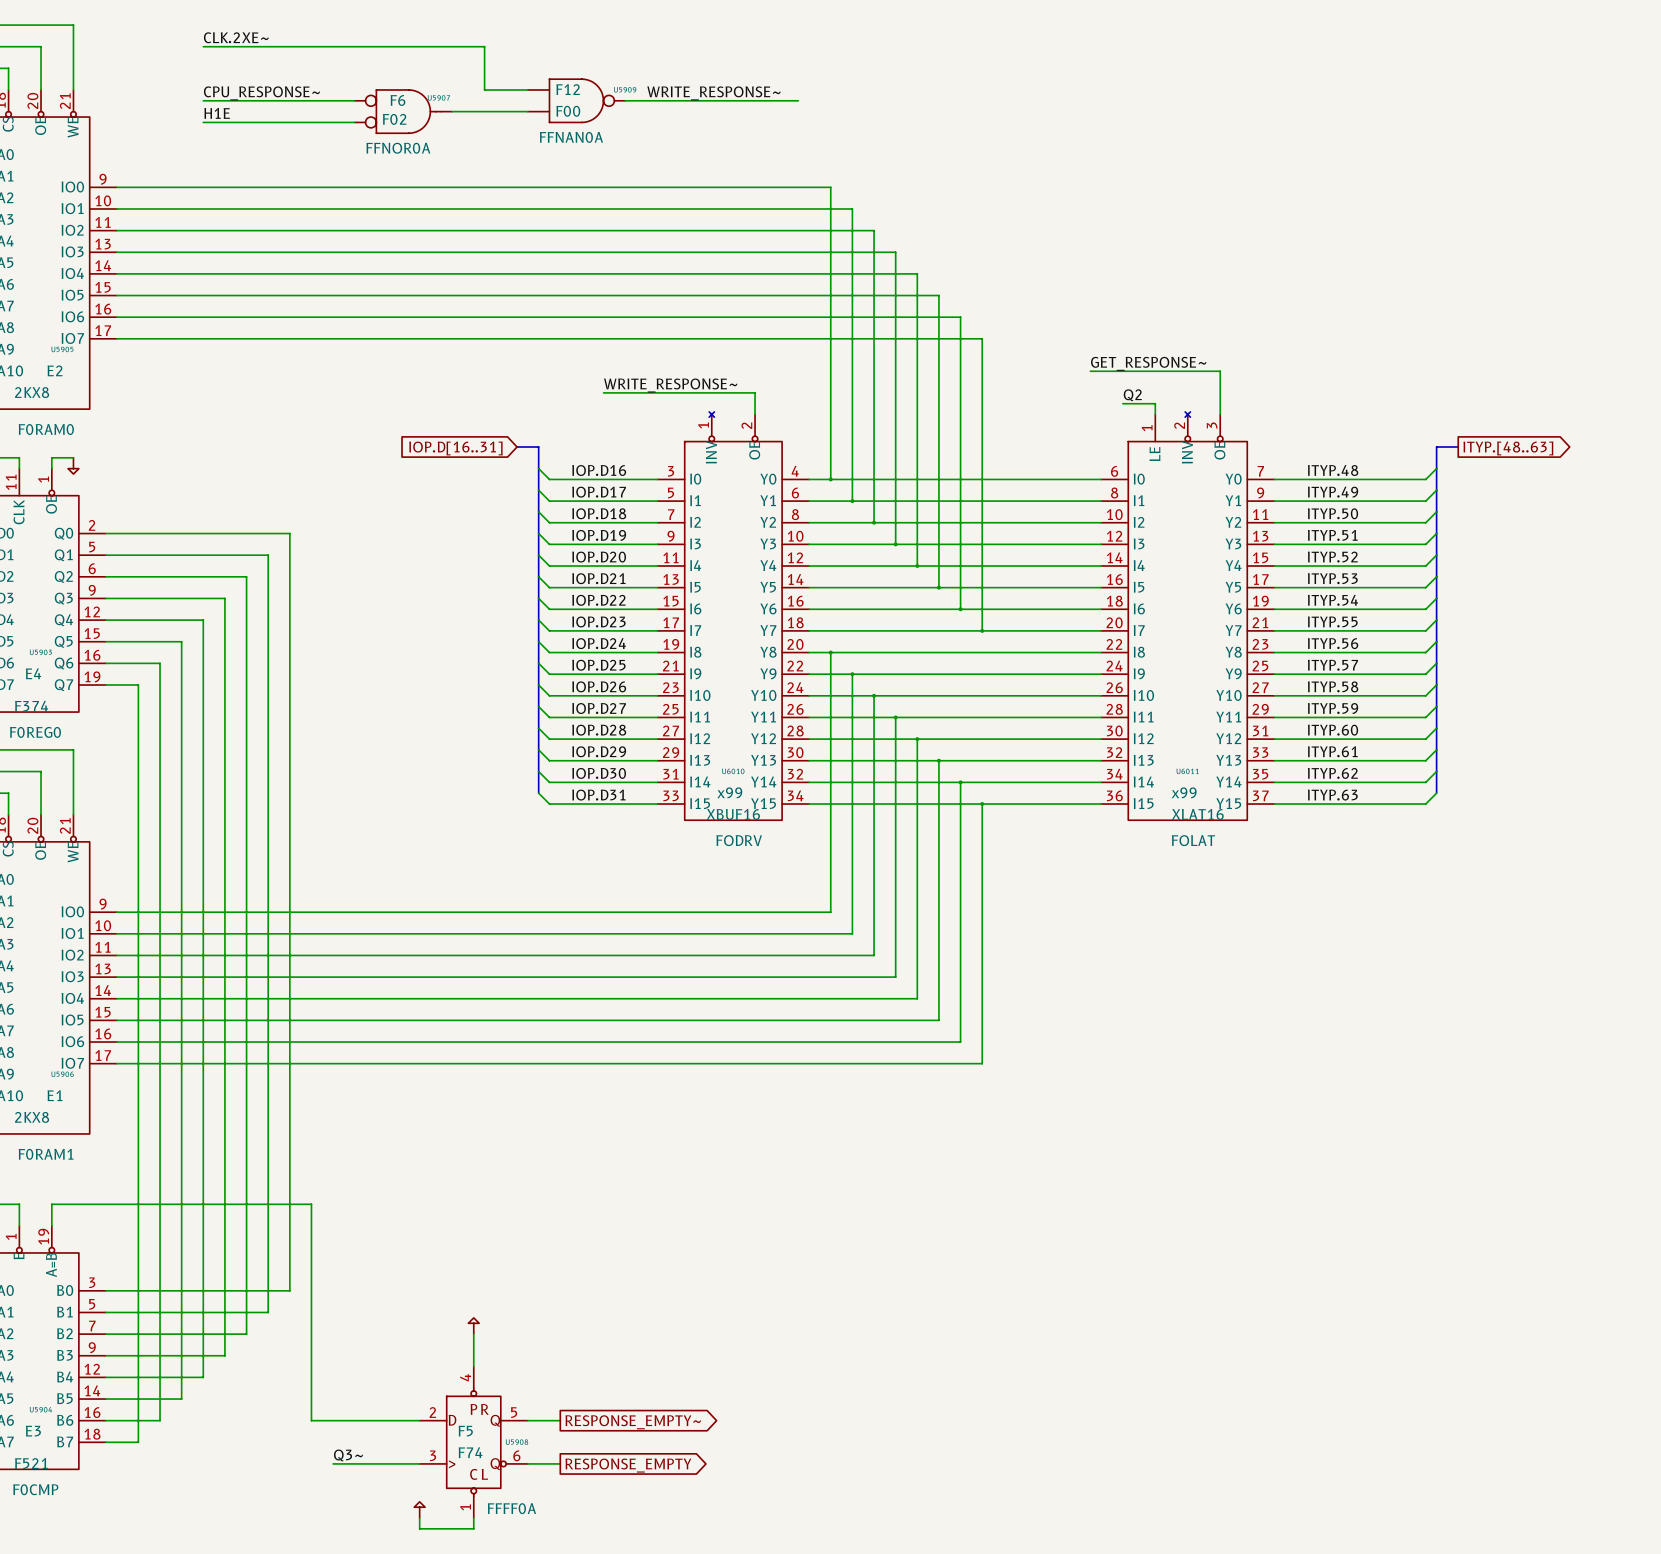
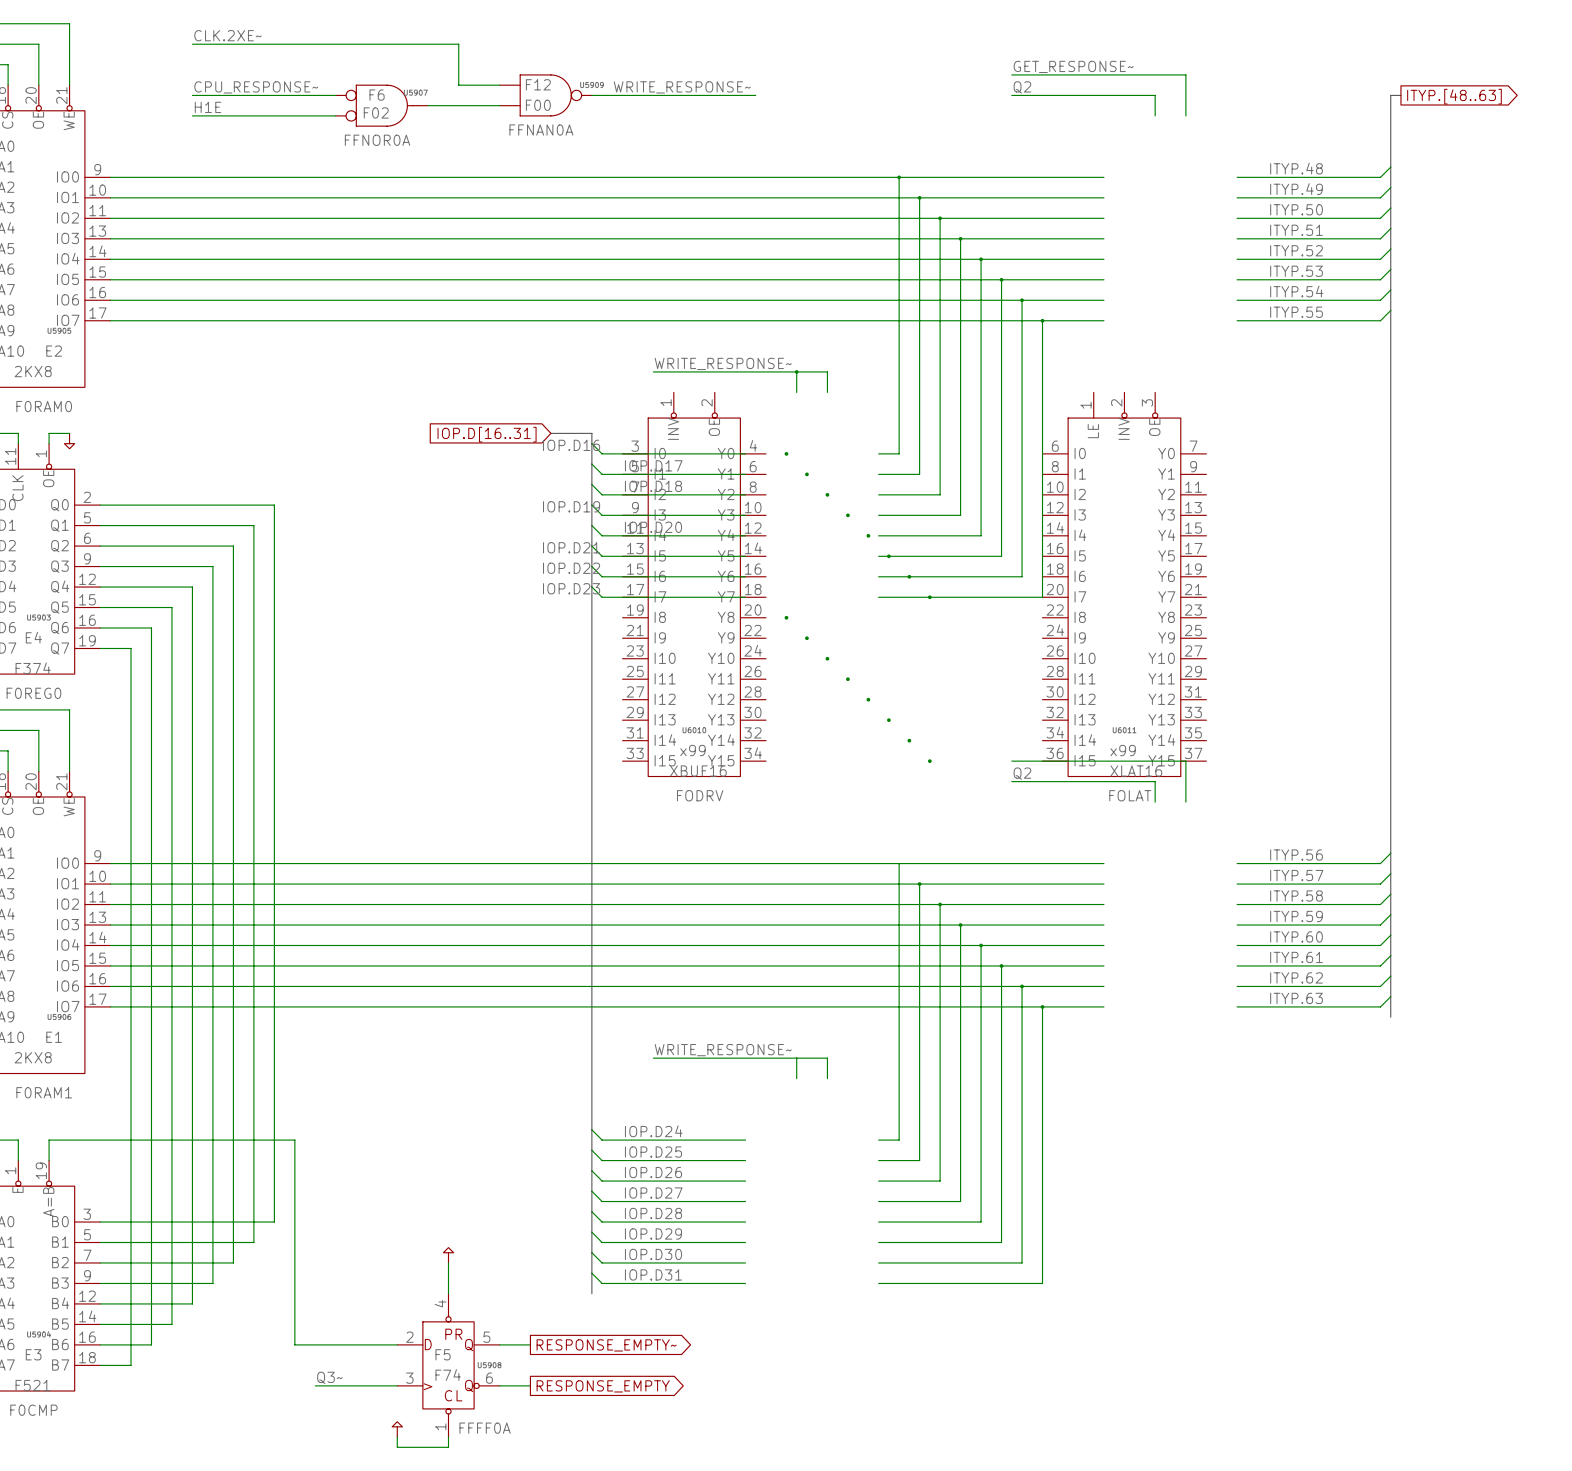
label: none -> GET_RESPONSE~ (1073, 66)
wire: none -> (1011, 74) (1185, 74) (1185, 115)
label: none -> Q2 (1022, 87)
wire: none -> (1011, 95) (1155, 95) (1155, 115)
bus: none -> (1400, 95) (1390, 95) (1390, 1017)
global label: none -> ITYP.[48..63] (1454, 96)
wire: none -> (1390, 167) (1380, 177) (1237, 177)
label: none -> ITYP.48 (1296, 168)
wire: (830, 187) (830, 479) -> (786, 177) (1103, 177)
junction: none -> (899, 177)
wire: none -> (1390, 187) (1380, 197) (1237, 197)
label: none -> ITYP.49 (1296, 189)
wire: (852, 208) (852, 501) -> (806, 197) (1103, 197)
junction: none -> (919, 197)
wire: none -> (1390, 208) (1380, 218) (1237, 218)
label: none -> ITYP.50 (1296, 209)
wire: (874, 230) (874, 392) -> (827, 218) (1103, 218)
junction: none -> (940, 218)
wire: none -> (1390, 228) (1380, 238) (1237, 238)
label: none -> ITYP.51 (1296, 230)
wire: (895, 252) (895, 544) -> (847, 238) (1103, 238)
junction: none -> (960, 238)
wire: none -> (1390, 249) (1380, 259) (1237, 259)
label: none -> ITYP.52 (1296, 250)
wire: (917, 273) (917, 566) -> (868, 259) (1103, 259)
junction: none -> (981, 259)
wire: none -> (1390, 269) (1380, 279) (1237, 279)
label: none -> ITYP.53 (1296, 271)
wire: (938, 295) (938, 587) -> (888, 279) (1103, 279)
junction: none -> (1001, 279)
wire: none -> (1390, 290) (1380, 300) (1237, 300)
label: none -> ITYP.54 (1296, 291)
wire: (960, 317) (960, 609) -> (909, 300) (1103, 300)
junction: none -> (1022, 300)
wire: none -> (1390, 310) (1380, 320) (1237, 320)
label: none -> ITYP.55 (1296, 312)
wire: (982, 338) (982, 630) -> (929, 320) (1103, 320)
wire: none -> (1042, 320) (1042, 597)
junction: none -> (1042, 320)
label: GET_RESPONSE~ (1148, 363) -> none
wire: (1090, 371) (1220, 371) (1220, 414) -> none
label position: WRITE_RESPONSE~ (670, 385) -> WRITE_RESPONSE~ (723, 363)
wire: (603, 392) (690, 392) -> none
wire: (755, 392) (755, 414) -> (714, 371) (827, 371)
wire: none -> (796, 371) (796, 392)
junction: none -> (796, 371)
label: Q2 (1132, 395) -> none
wire: (1122, 403) (1155, 403) (1155, 414) -> none
no-connect mark: (711, 414) -> none
wire: (874, 414) (874, 522) -> none
no-connect mark: (1187, 414) -> none
bus: (517, 447) (538, 447) (538, 793) -> none
bus: (1458, 447) (1436, 447) (1436, 793) -> none
global label position: IOP.D[16..31] (455, 448) -> IOP.D[16..31] (487, 434)
global label: ITYP.[48..63] (1508, 448) -> none
bus: none -> (550, 433) (591, 433) (591, 1293)
wire: (538, 468) (549, 479) (636, 479) -> (591, 443) (602, 453)
wire: (1436, 468) (1425, 479) (1274, 479) -> none
label: ITYP.48 (1333, 470) -> none
wire: none -> (622, 453) (745, 453)
wire: (809, 479) (928, 479) -> none
wire: (949, 479) (1101, 479) -> (899, 453) (899, 177)
wire: (538, 490) (549, 501) (636, 501) -> (591, 464) (602, 474)
wire: (1436, 490) (1425, 501) (1274, 501) -> none
label position: IOP.D17 (599, 492) -> IOP.D17 (653, 465)
label: ITYP.49 (1333, 492) -> none
wire: none -> (622, 474) (745, 474)
wire: (809, 501) (928, 501) -> none
wire: (971, 501) (1101, 501) -> (919, 474) (919, 197)
wire: (538, 511) (549, 522) (636, 522) -> (591, 484) (602, 494)
wire: (1436, 511) (1425, 522) (1274, 522) -> none
label position: IOP.D18 (599, 513) -> IOP.D18 (653, 486)
label: ITYP.50 (1333, 513) -> none
wire: none -> (622, 494) (745, 494)
wire: (809, 522) (928, 522) -> none
wire: (993, 522) (1101, 522) -> (940, 494) (940, 218)
wire: (538, 533) (549, 544) (636, 544) -> (591, 505) (602, 515)
wire: (1436, 533) (1425, 544) (1274, 544) -> none
label: ITYP.51 (1332, 535) -> none
wire: none -> (622, 515) (745, 515)
wire: (809, 544) (928, 544) -> none
wire: (1014, 544) (1101, 544) -> (960, 515) (960, 238)
wire: (538, 555) (549, 566) (636, 566) -> (591, 525) (602, 535)
wire: (1436, 555) (1425, 566) (1274, 566) -> none
label position: IOP.D20 (599, 557) -> IOP.D20 (653, 527)
label: ITYP.52 (1332, 557) -> none
wire: none -> (622, 535) (745, 535)
wire: (809, 566) (928, 566) -> none
wire: (1036, 566) (1101, 566) -> (981, 535) (981, 259)
wire: (538, 576) (549, 587) (636, 587) -> (591, 546) (602, 556)
wire: (1436, 576) (1425, 587) (1274, 587) -> none
label: ITYP.53 (1332, 578) -> none
wire: none -> (622, 556) (745, 556)
wire: (809, 587) (928, 587) -> none
wire: (1057, 587) (1101, 587) -> (1001, 556) (1001, 279)
wire: (538, 598) (549, 609) (636, 609) -> (591, 566) (602, 576)
wire: (1436, 598) (1425, 609) (1274, 609) -> none
label: ITYP.54 (1332, 600) -> none
wire: none -> (622, 576) (745, 576)
wire: (809, 609) (928, 609) -> none
wire: (1079, 609) (1101, 609) -> (1022, 576) (1022, 300)
wire: (538, 620) (549, 630) (636, 630) -> (591, 587) (602, 597)
wire: (1436, 620) (1425, 630) (1274, 630) -> none
label: ITYP.55 (1332, 621) -> none
wire: none -> (622, 597) (745, 597)
wire: (809, 630) (928, 630) -> none
wire: (538, 641) (549, 652) (657, 652) -> none
wire: (1436, 641) (1425, 652) (1274, 652) -> none
label: IOP.D24 (599, 643) -> none
label: ITYP.56 (1333, 643) -> none
wire: (809, 652) (1101, 652) -> none
wire: (830, 652) (830, 912) -> (1103, 863) (786, 863)
wire: (538, 663) (549, 674) (657, 674) -> none
wire: (1436, 663) (1425, 674) (1274, 674) -> none
label: IOP.D25 (598, 665) -> none
label: ITYP.57 (1332, 665) -> none
wire: (809, 674) (1101, 674) -> none
wire: (852, 674) (852, 933) -> (1103, 884) (806, 884)
wire: (538, 685) (549, 695) (657, 695) -> none
wire: (1436, 685) (1425, 695) (1274, 695) -> none
label: IOP.D26 (599, 686) -> none
label: ITYP.58 (1333, 686) -> none
wire: (809, 695) (1101, 695) -> none
wire: (874, 695) (874, 955) -> (1103, 904) (827, 904)
wire: (538, 706) (549, 717) (657, 717) -> none
wire: (1436, 706) (1425, 717) (1274, 717) -> none
label: IOP.D27 (599, 708) -> none
label: ITYP.59 (1333, 708) -> none
wire: (809, 717) (1101, 717) -> none
wire: (895, 717) (895, 977) -> (1103, 925) (847, 925)
wire: (538, 728) (549, 739) (657, 739) -> none
wire: (1436, 728) (1425, 739) (1274, 739) -> none
label: IOP.D28 (599, 730) -> none
label: ITYP.60 (1333, 730) -> none
wire: (809, 739) (1101, 739) -> none
wire: (917, 739) (917, 998) -> (1103, 945) (868, 945)
wire: (538, 749) (549, 760) (657, 760) -> none
wire: (1436, 749) (1425, 760) (1274, 760) -> none
label: IOP.D29 (599, 751) -> none
label: ITYP.61 (1332, 751) -> none
wire: (809, 760) (1101, 760) -> none
wire: (938, 760) (938, 1020) -> (1103, 965) (888, 965)
wire: (538, 771) (549, 782) (657, 782) -> none
wire: (1436, 771) (1425, 782) (1274, 782) -> none
label: IOP.D30 (599, 773) -> none
label: ITYP.62 (1332, 773) -> none
wire: (809, 782) (1101, 782) -> none
wire: (960, 782) (960, 1042) -> (1103, 986) (909, 986)
wire: (538, 793) (549, 804) (657, 804) -> none
wire: (1436, 793) (1425, 804) (1274, 804) -> none
label: IOP.D31 (598, 795) -> none
label: ITYP.63 (1332, 795) -> none
wire: (809, 804) (1068, 804) -> none
wire: (982, 804) (982, 1063) -> (1103, 1006) (929, 1006)
wire: none -> (1042, 761) (1185, 761) (1185, 802)
label: none -> Q2 (1022, 773)
wire: none -> (1011, 781) (1155, 781) (1155, 802)
wire: none -> (1390, 853) (1380, 863) (1237, 863)
label: none -> ITYP.56 (1296, 855)
wire: none -> (899, 863) (899, 1140) (878, 1140)
wire: none -> (1390, 873) (1380, 884) (1237, 884)
label: none -> ITYP.57 (1296, 875)
wire: none -> (919, 884) (919, 1160) (878, 1160)
junction: none -> (919, 884)
wire: none -> (1390, 894) (1380, 904) (1237, 904)
label: none -> ITYP.58 (1296, 896)
wire: none -> (940, 904) (940, 1181) (878, 1181)
junction: none -> (940, 904)
wire: none -> (1390, 914) (1380, 925) (1237, 925)
label: none -> ITYP.59 (1296, 916)
wire: none -> (960, 925) (960, 1201) (878, 1201)
junction: none -> (960, 925)
wire: none -> (1390, 935) (1380, 945) (1237, 945)
label: none -> ITYP.60 (1296, 936)
wire: none -> (981, 945) (981, 1222) (878, 1222)
junction: none -> (981, 945)
wire: none -> (1390, 955) (1380, 965) (1237, 965)
label: none -> ITYP.61 (1296, 957)
wire: none -> (1001, 965) (1001, 1242) (878, 1242)
junction: none -> (1001, 965)
wire: none -> (1390, 976) (1380, 986) (1237, 986)
label: none -> ITYP.62 (1296, 977)
wire: none -> (1022, 986) (1022, 1262) (878, 1262)
junction: none -> (1022, 986)
wire: none -> (1390, 996) (1380, 1006) (1237, 1006)
label: none -> ITYP.63 (1296, 998)
wire: none -> (1042, 1006) (1042, 1283) (878, 1283)
junction: none -> (1042, 1006)
label: none -> WRITE_RESPONSE~ (723, 1050)
wire: none -> (653, 1058) (827, 1058) (827, 1078)
wire: none -> (796, 1058) (796, 1078)
wire: none -> (591, 1129) (602, 1140) (745, 1140)
label: none -> IOP.D24 (653, 1131)
wire: none -> (591, 1150) (602, 1160) (745, 1160)
label: none -> IOP.D25 (653, 1152)
wire: none -> (591, 1170) (602, 1181) (745, 1181)
label: none -> IOP.D26 (653, 1172)
wire: none -> (591, 1191) (602, 1201) (745, 1201)
label: none -> IOP.D27 (653, 1193)
wire: none -> (591, 1211) (602, 1222) (745, 1222)
label: none -> IOP.D28 (653, 1213)
wire: none -> (591, 1232) (602, 1242) (745, 1242)
label: none -> IOP.D29 (653, 1233)
wire: none -> (591, 1252) (602, 1262) (745, 1262)
label: none -> IOP.D30 (653, 1254)
wire: none -> (591, 1273) (602, 1283) (745, 1283)
label: none -> IOP.D31 (653, 1274)

